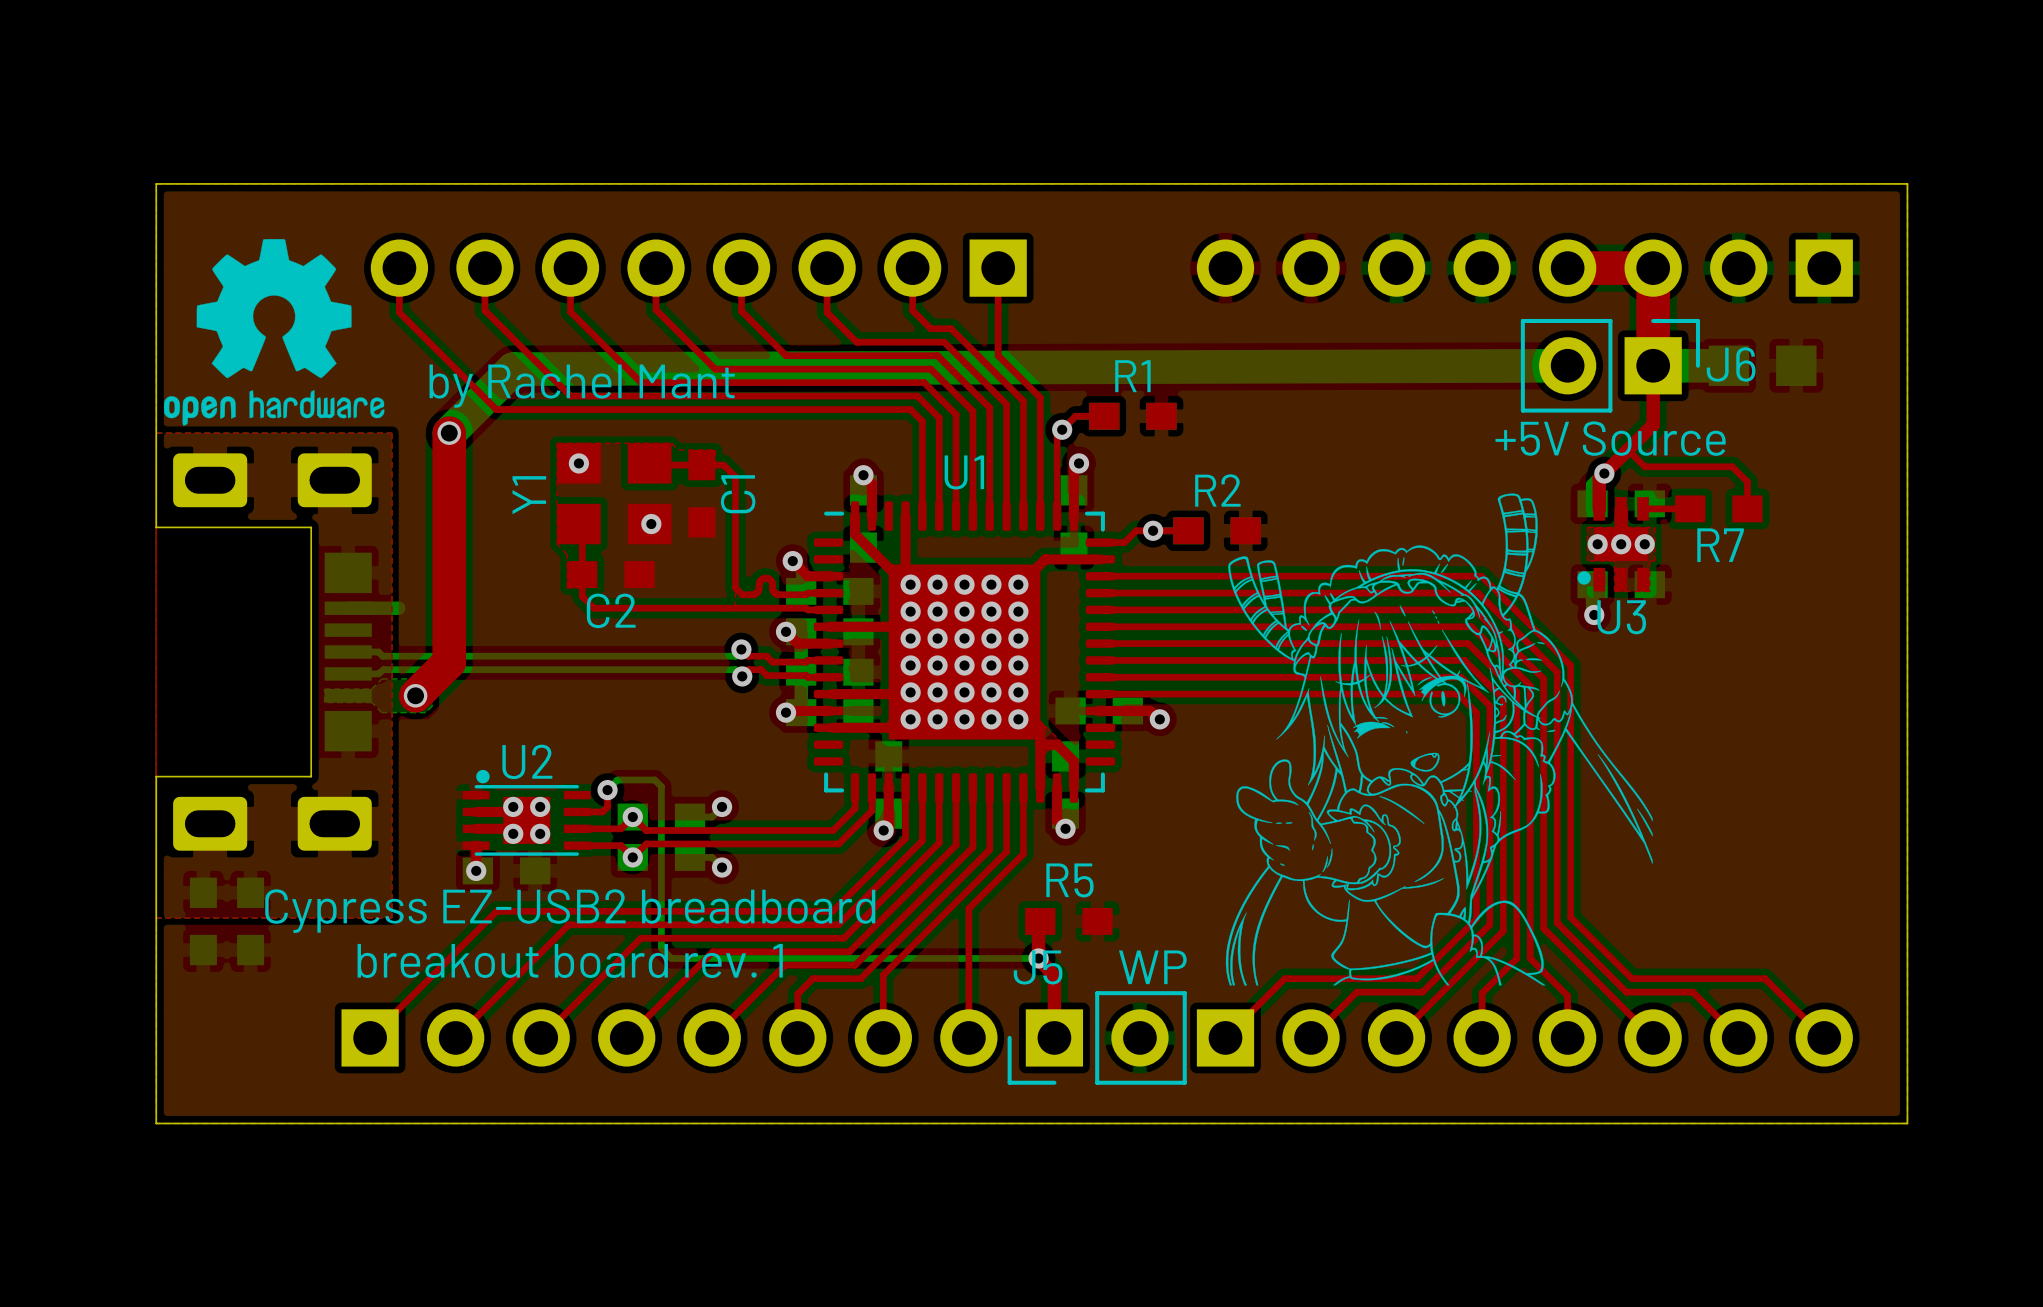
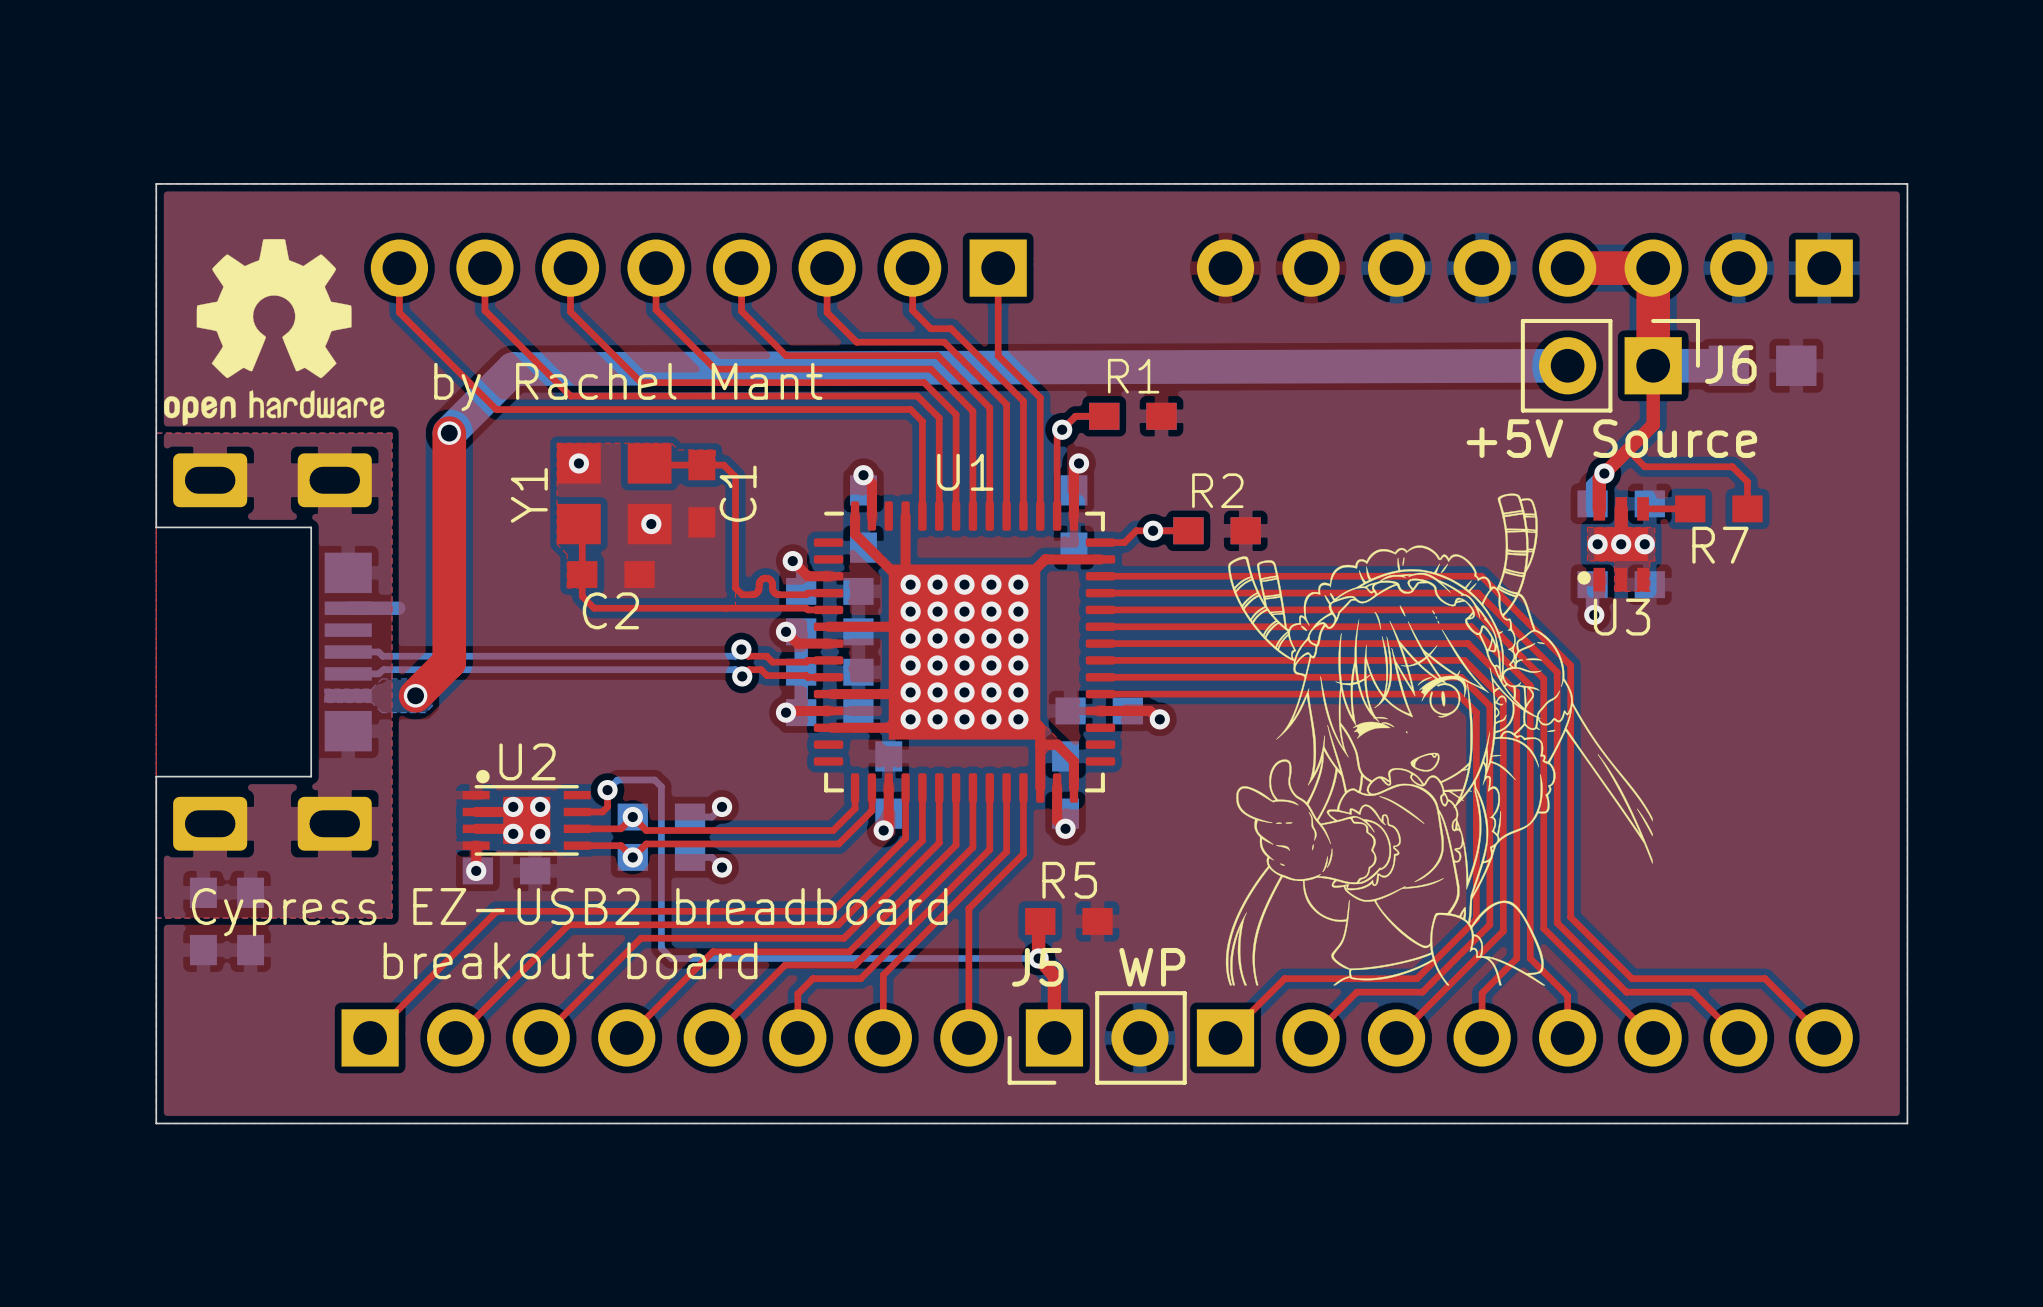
text: breakout board rev. 1 (570, 960) -> breakout board (570, 960)

